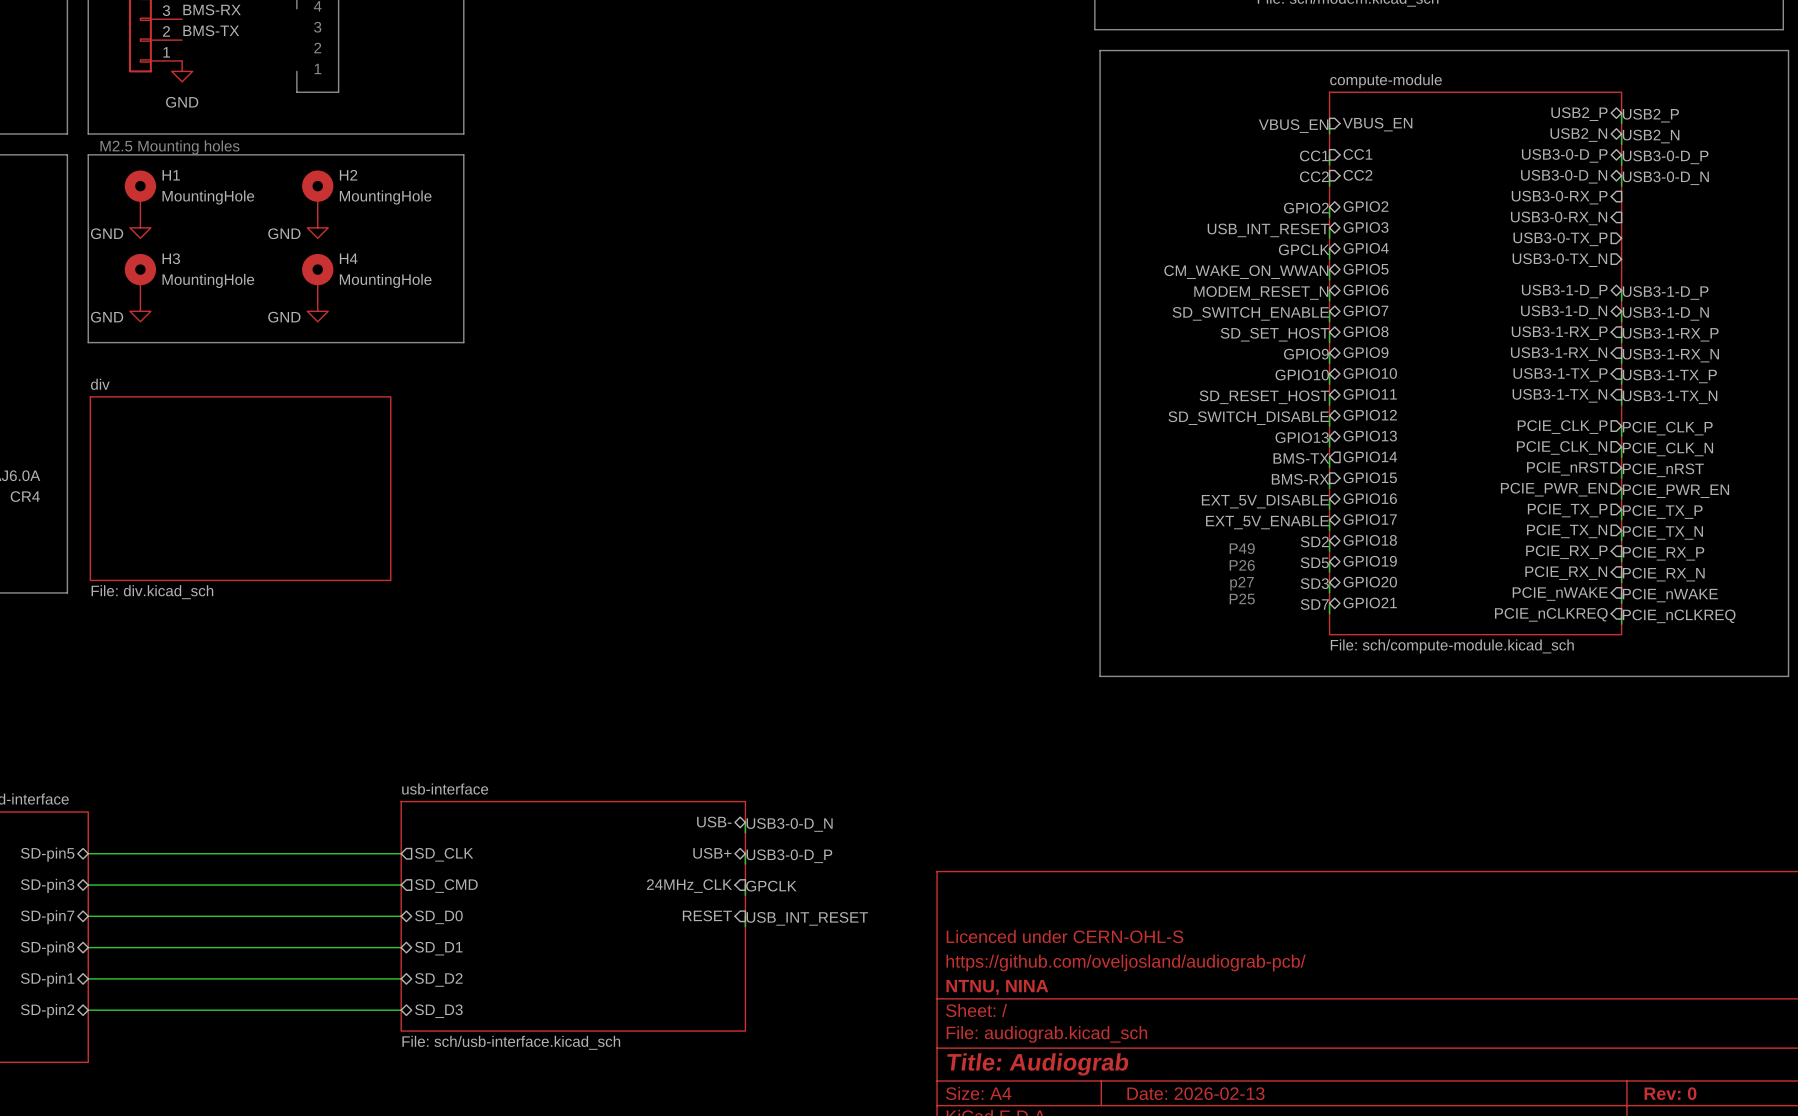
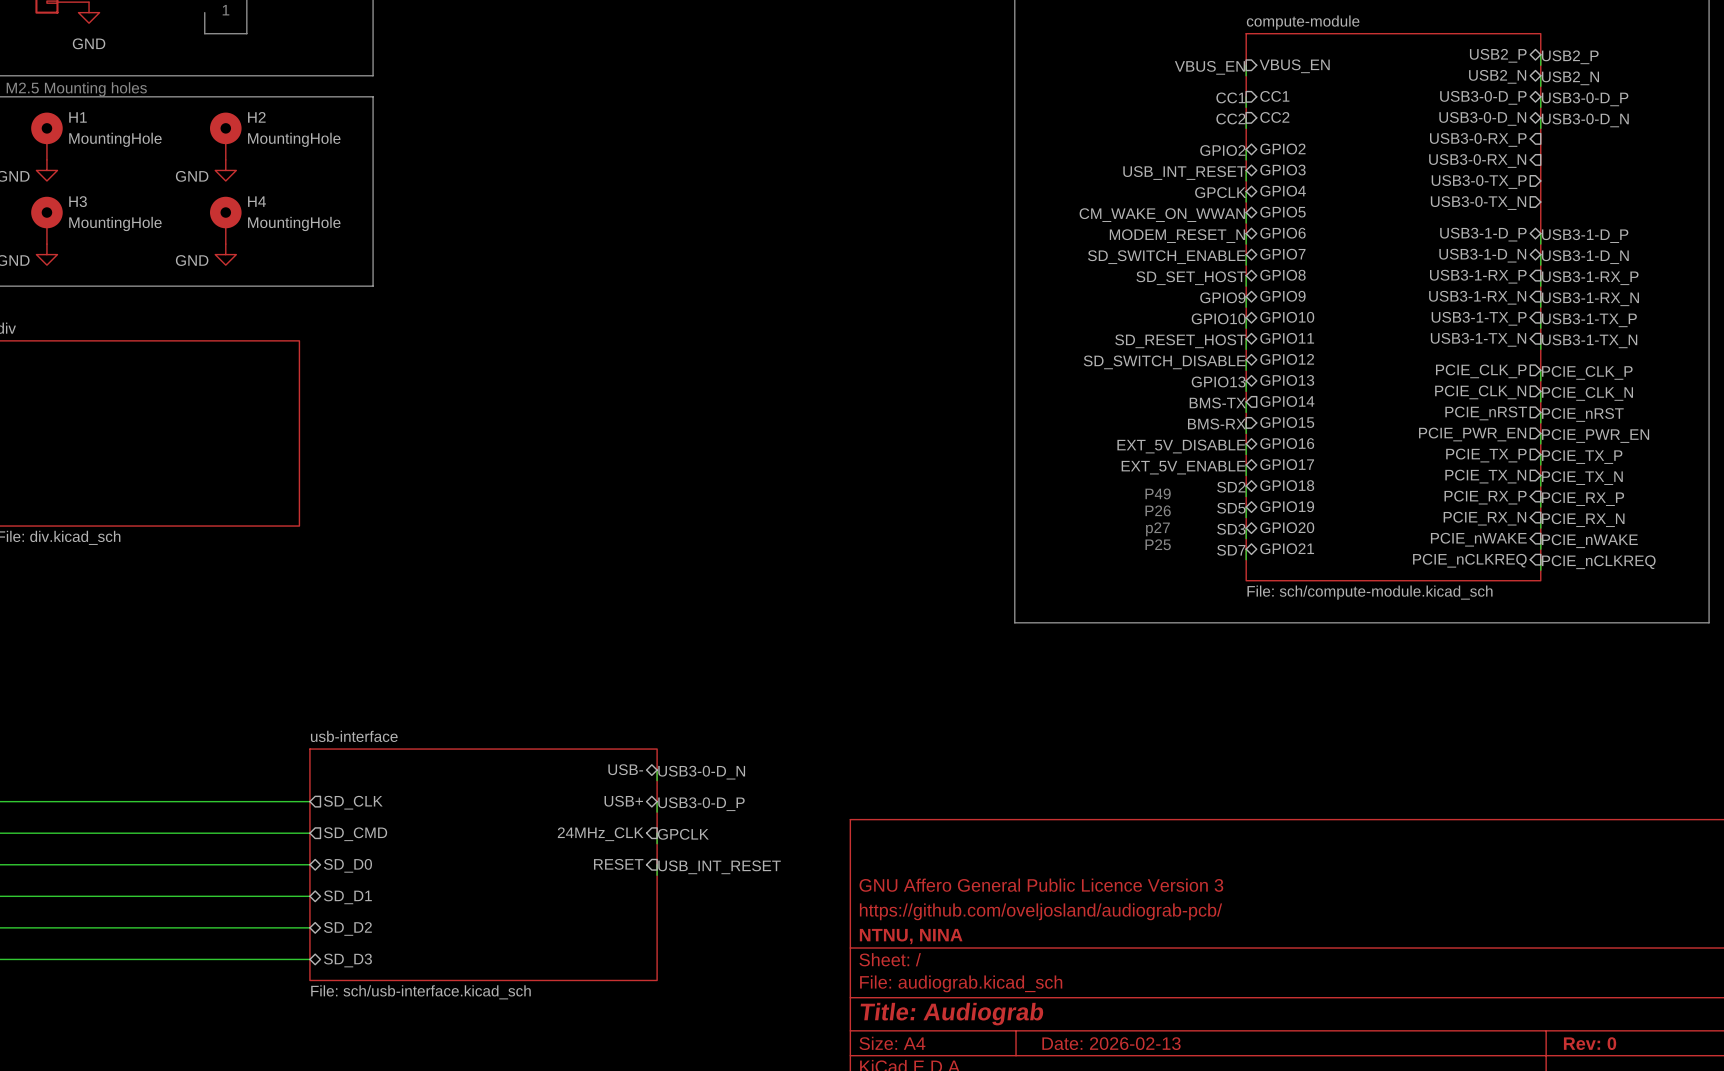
title block: Licenced under CERN-OHL-S (1065, 936) -> GNU Affero General Public Licence Version 3 (1041, 885)

